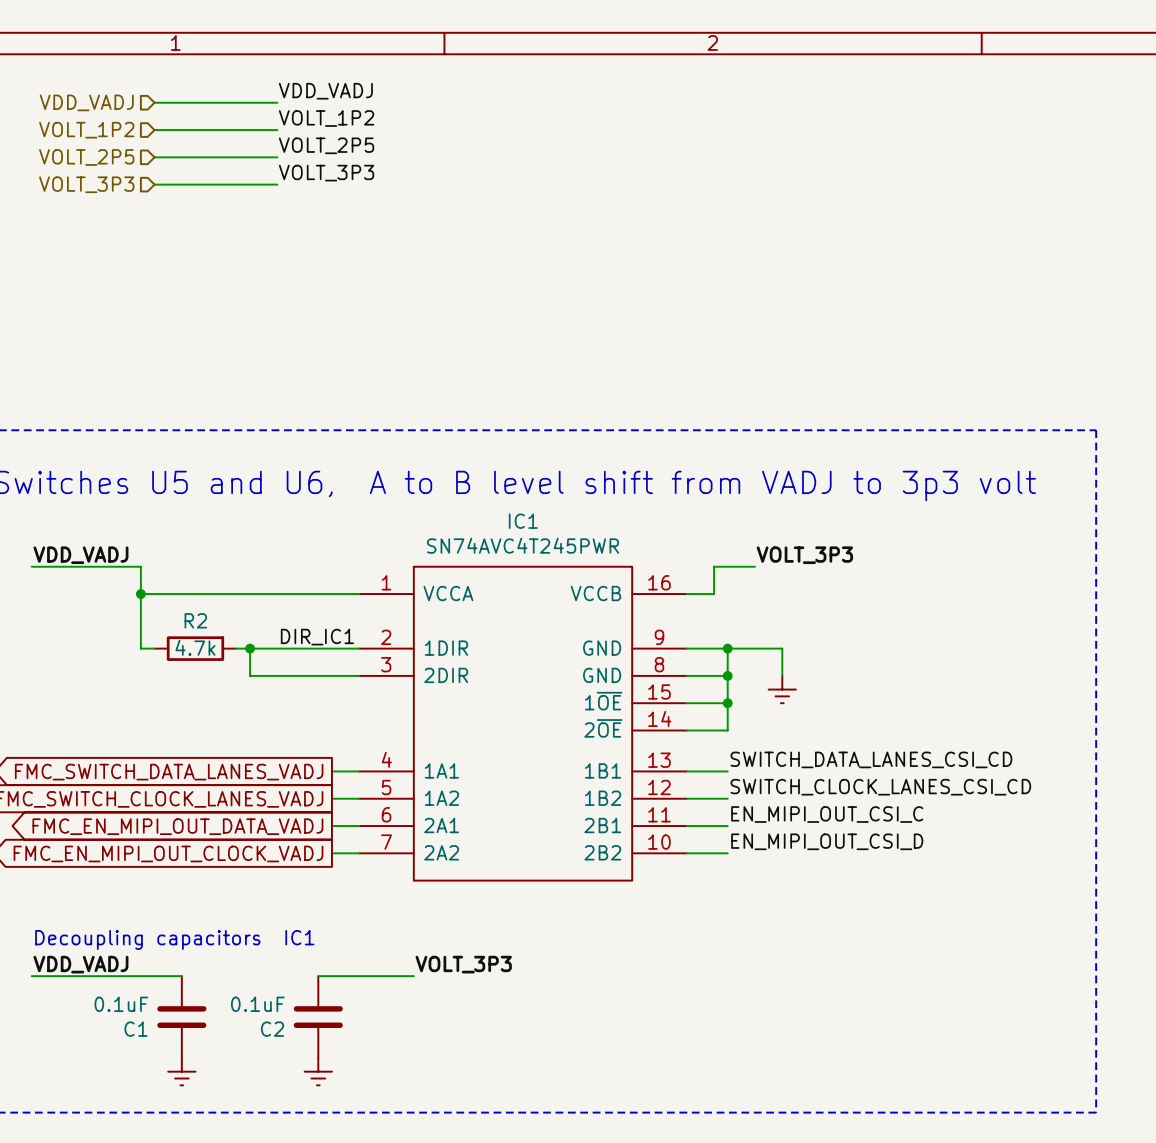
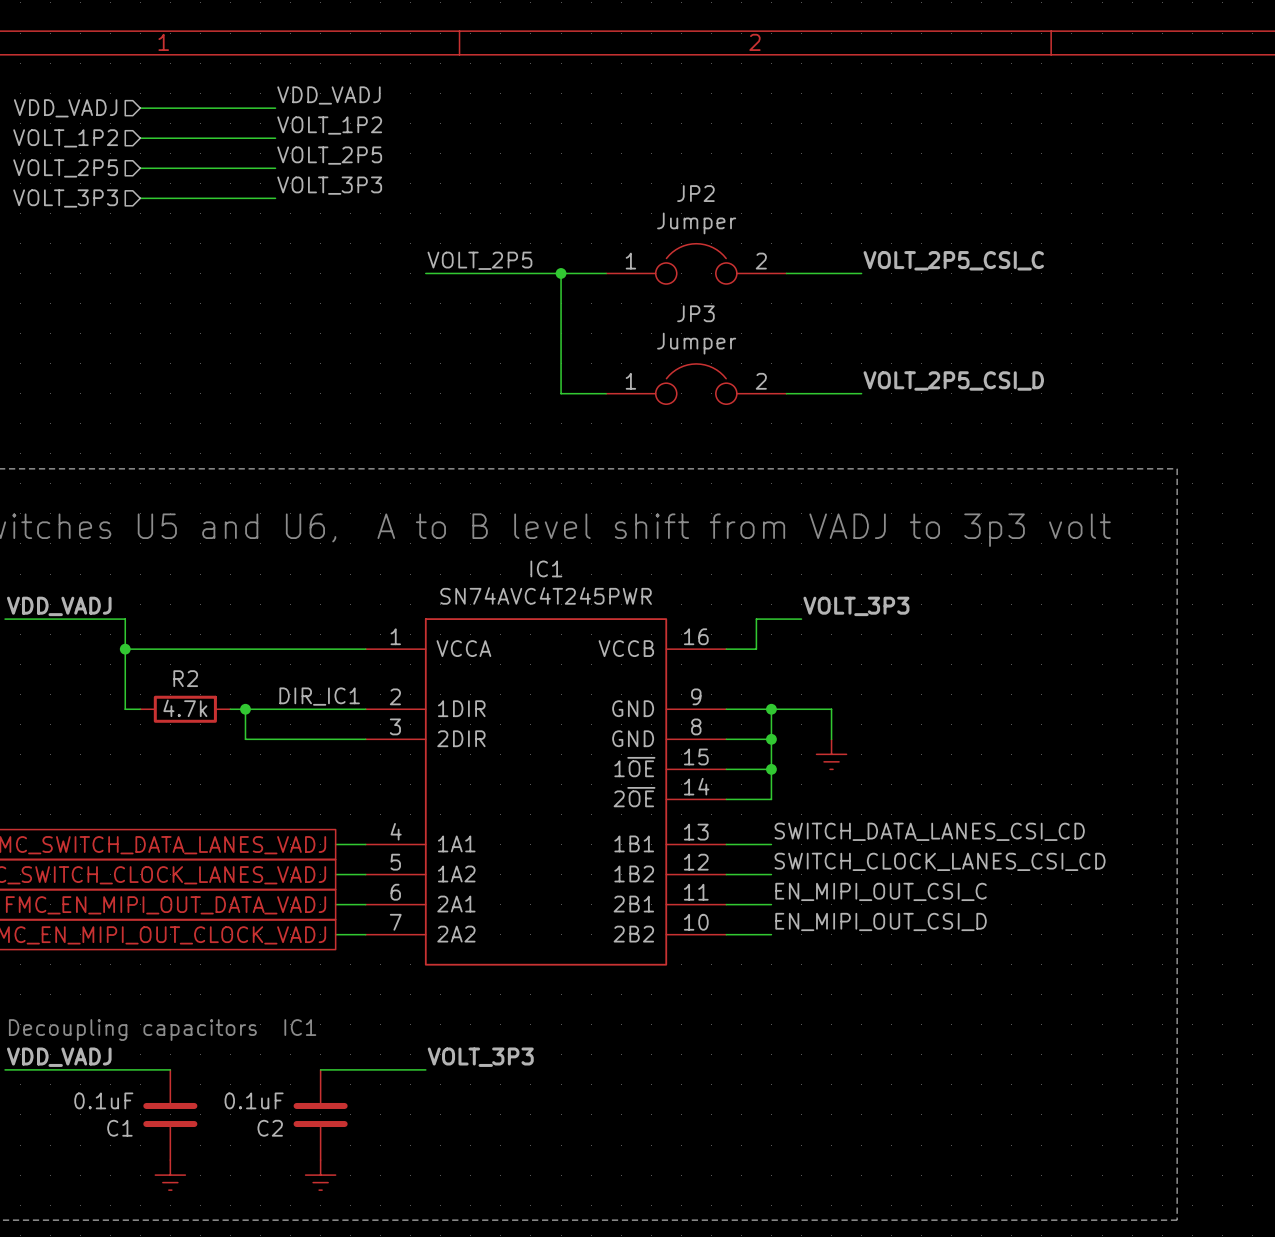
label: none -> VOLT_2P5 (479, 260)
label: none -> VOLT_2P5_CSI_C (953, 260)
JP2: none -> Jumper (696, 263)
wire: none -> (425, 273) (606, 273)
wire: none -> (561, 273) (561, 393) (606, 393)
junction: none -> (561, 273)
wire: none -> (786, 273) (861, 273)
label: none -> VOLT_2P5_CSI_D (953, 380)
JP3: none -> Jumper (696, 384)
wire: none -> (786, 393) (861, 393)

